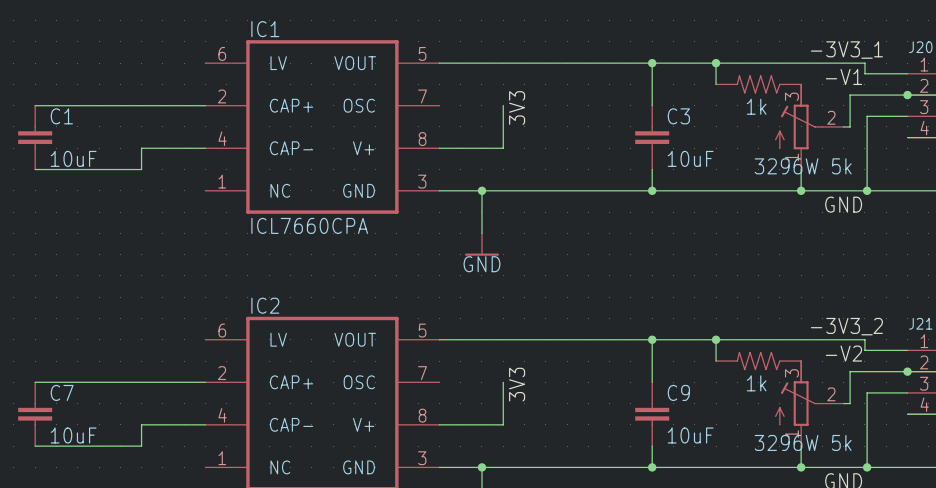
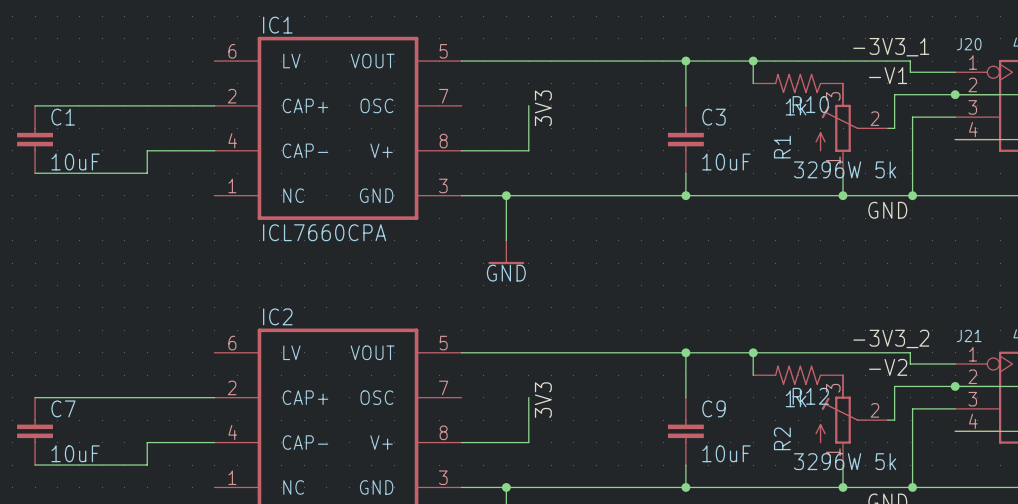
R10 name: none -> R10 (810, 104)
R1 name: none -> R1 (782, 147)
R12 name: none -> R12 (810, 396)
R2 name: none -> R2 (782, 438)

